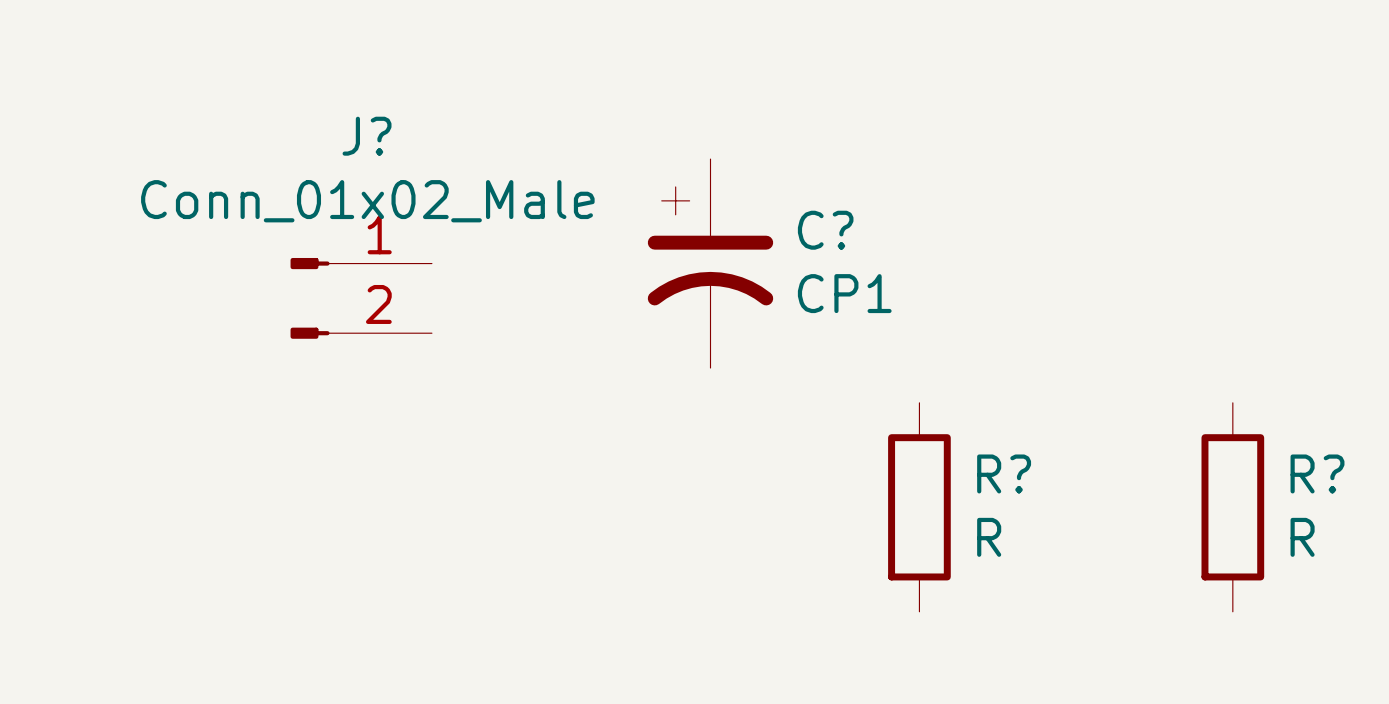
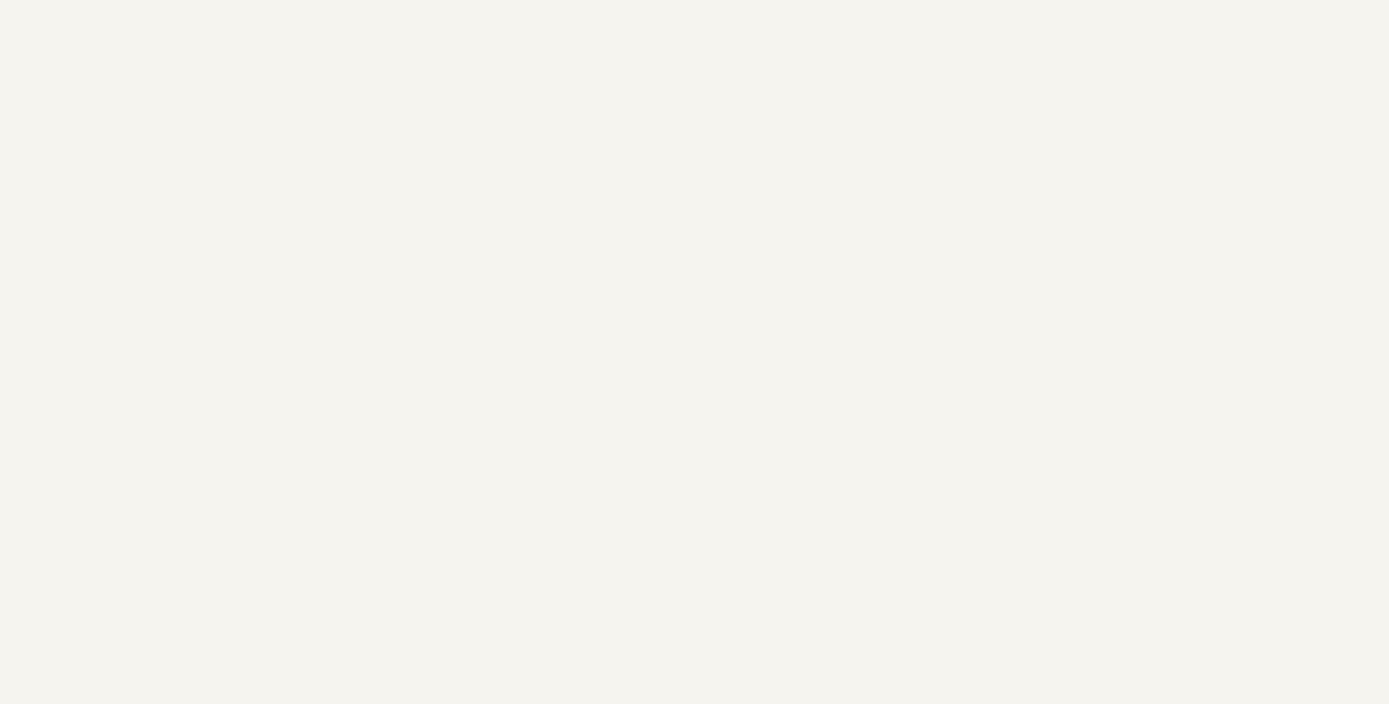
C?: CP1 (710, 263) -> none
J?: Conn_01x02_Male (361, 298) -> none
R?: R (919, 507) -> none
R?: R (1232, 507) -> none

